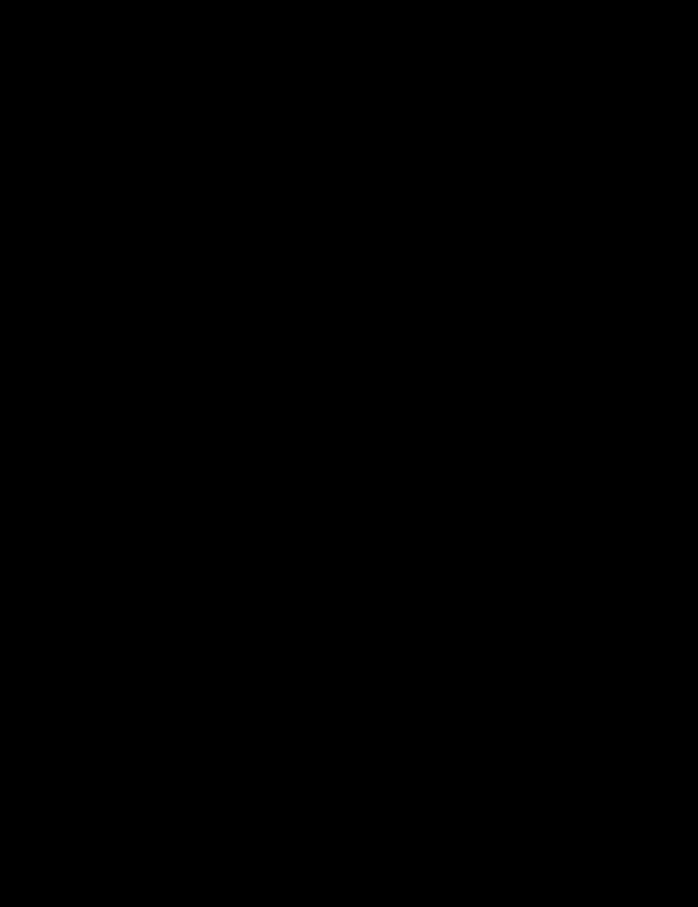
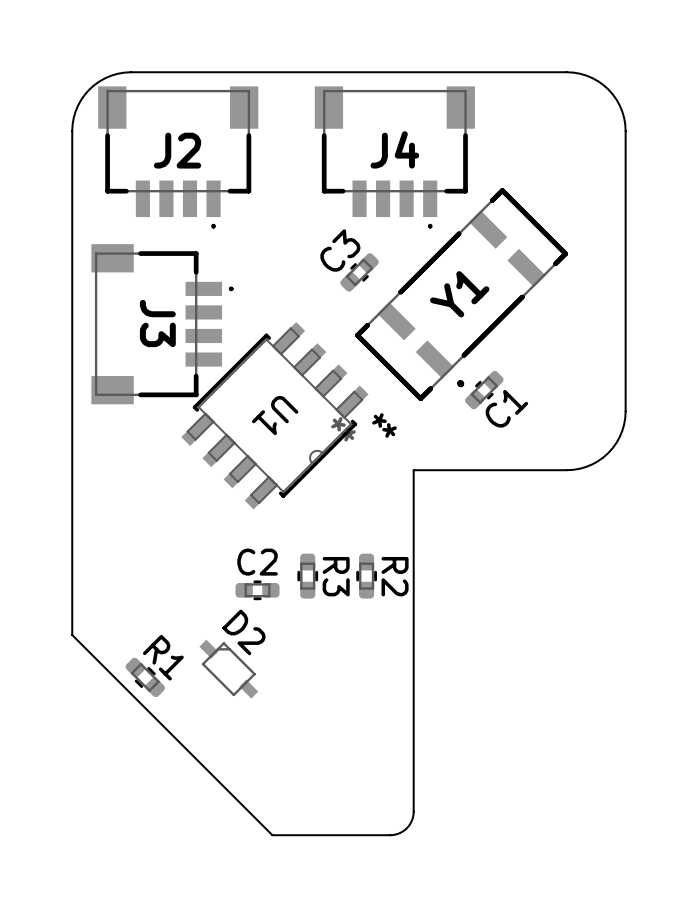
board edge: none -> (566, 72) (124, 72) (105, 78) (94, 85) (81, 99) (75, 111) (72, 131) (72, 635) (272, 835) (392, 835) (404, 830) (412, 819) (413, 470) (579, 468) (592, 464) (608, 452) (622, 430) (625, 411) (625, 124) (619, 105) (608, 89) (592, 78) (566, 72)
J2: none -> (178, 157)
J4: none -> (394, 157)
C3: none -> (359, 272)
Y1: none -> (461, 294)
J3: none -> (162, 324)
C1: none -> (484, 390)
U1: none -> (274, 415)
R3: none -> (307, 576)
R2: none -> (366, 576)
C2: none -> (257, 590)
D2: none -> (228, 669)
R1: none -> (145, 677)

